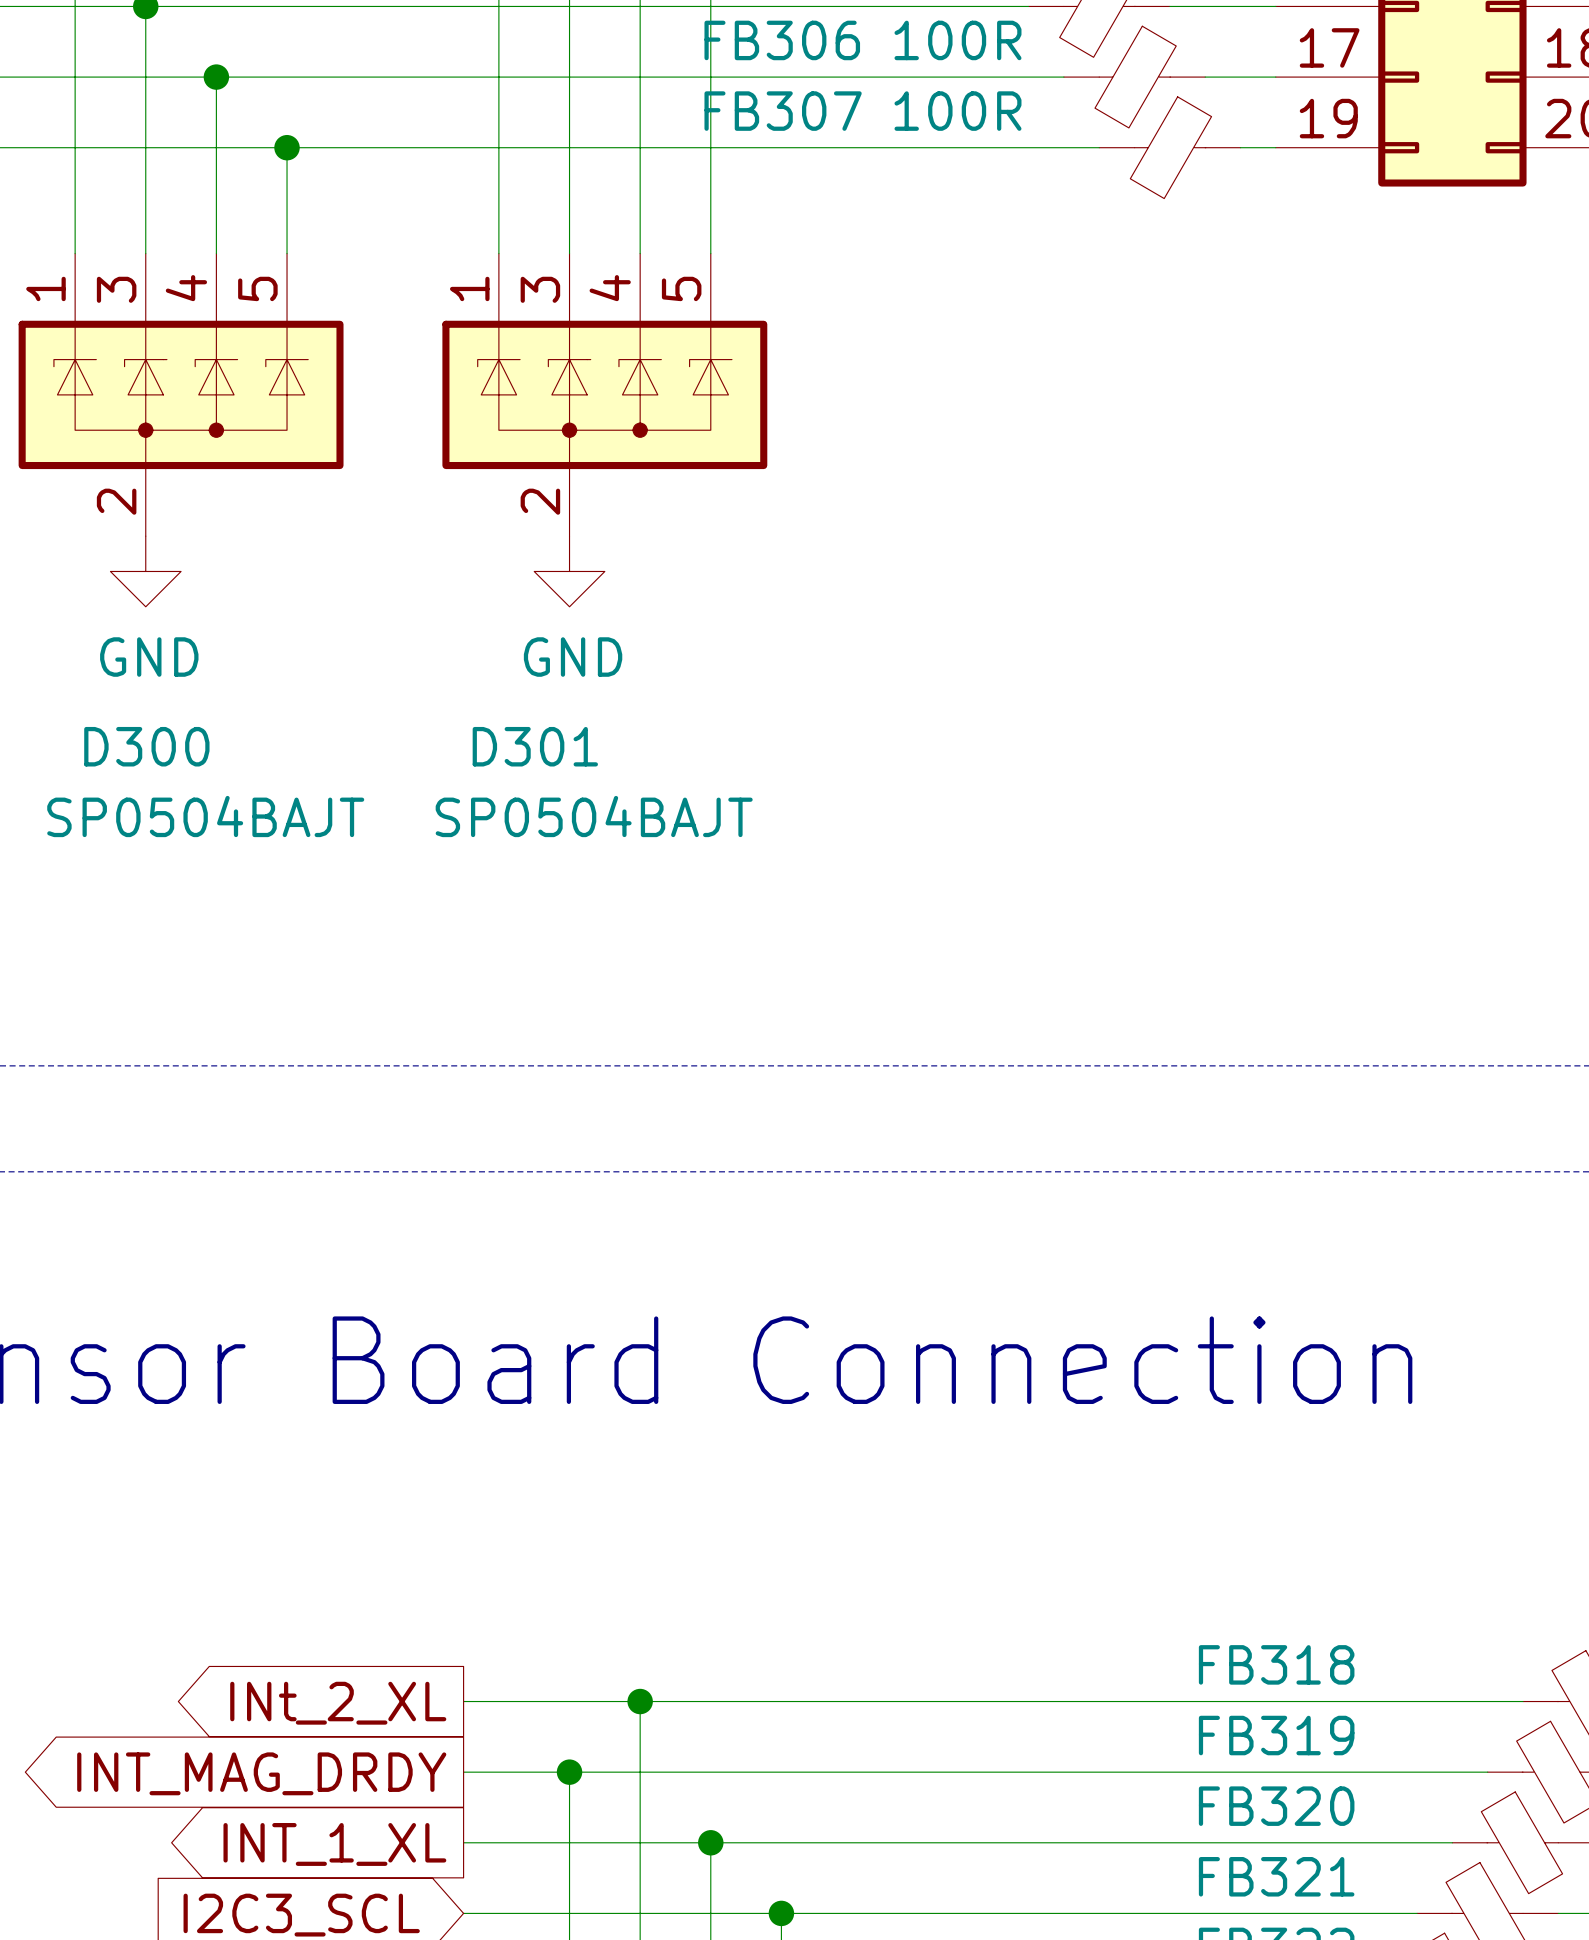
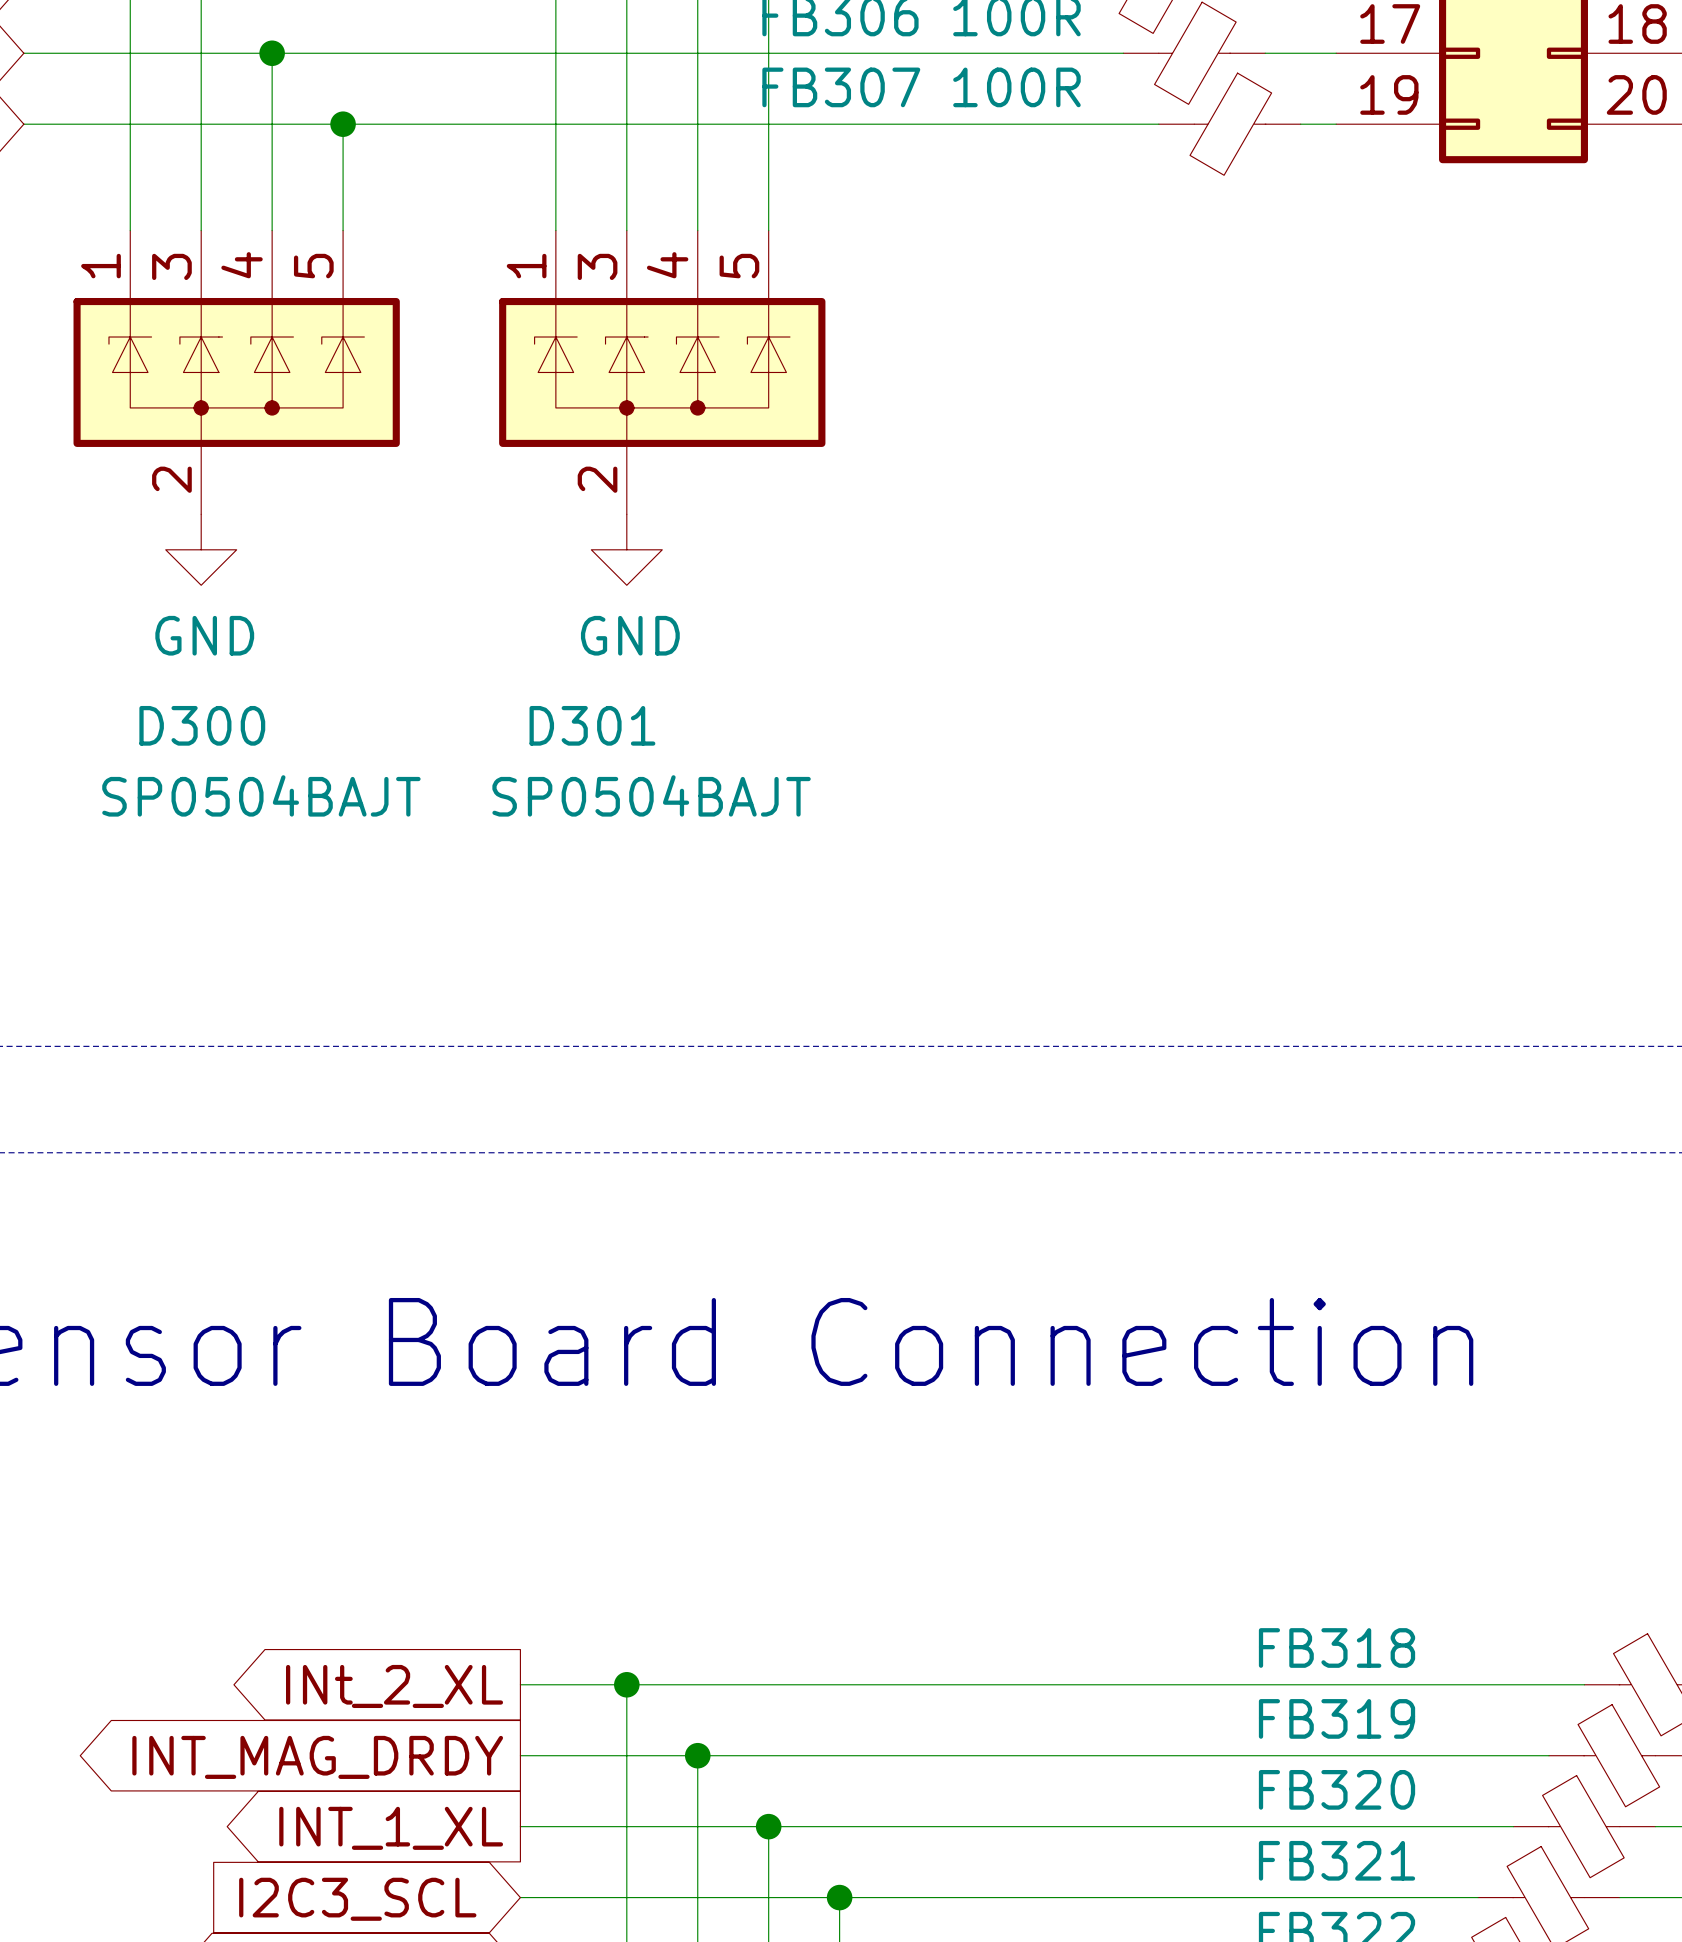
junction: none -> (626, 1684)
wire: (640, 1701) (640, 1772) -> (626, 1684) (626, 1755)
junction: (640, 1701) -> none
junction: (569, 1772) -> none
junction: none -> (697, 1755)

